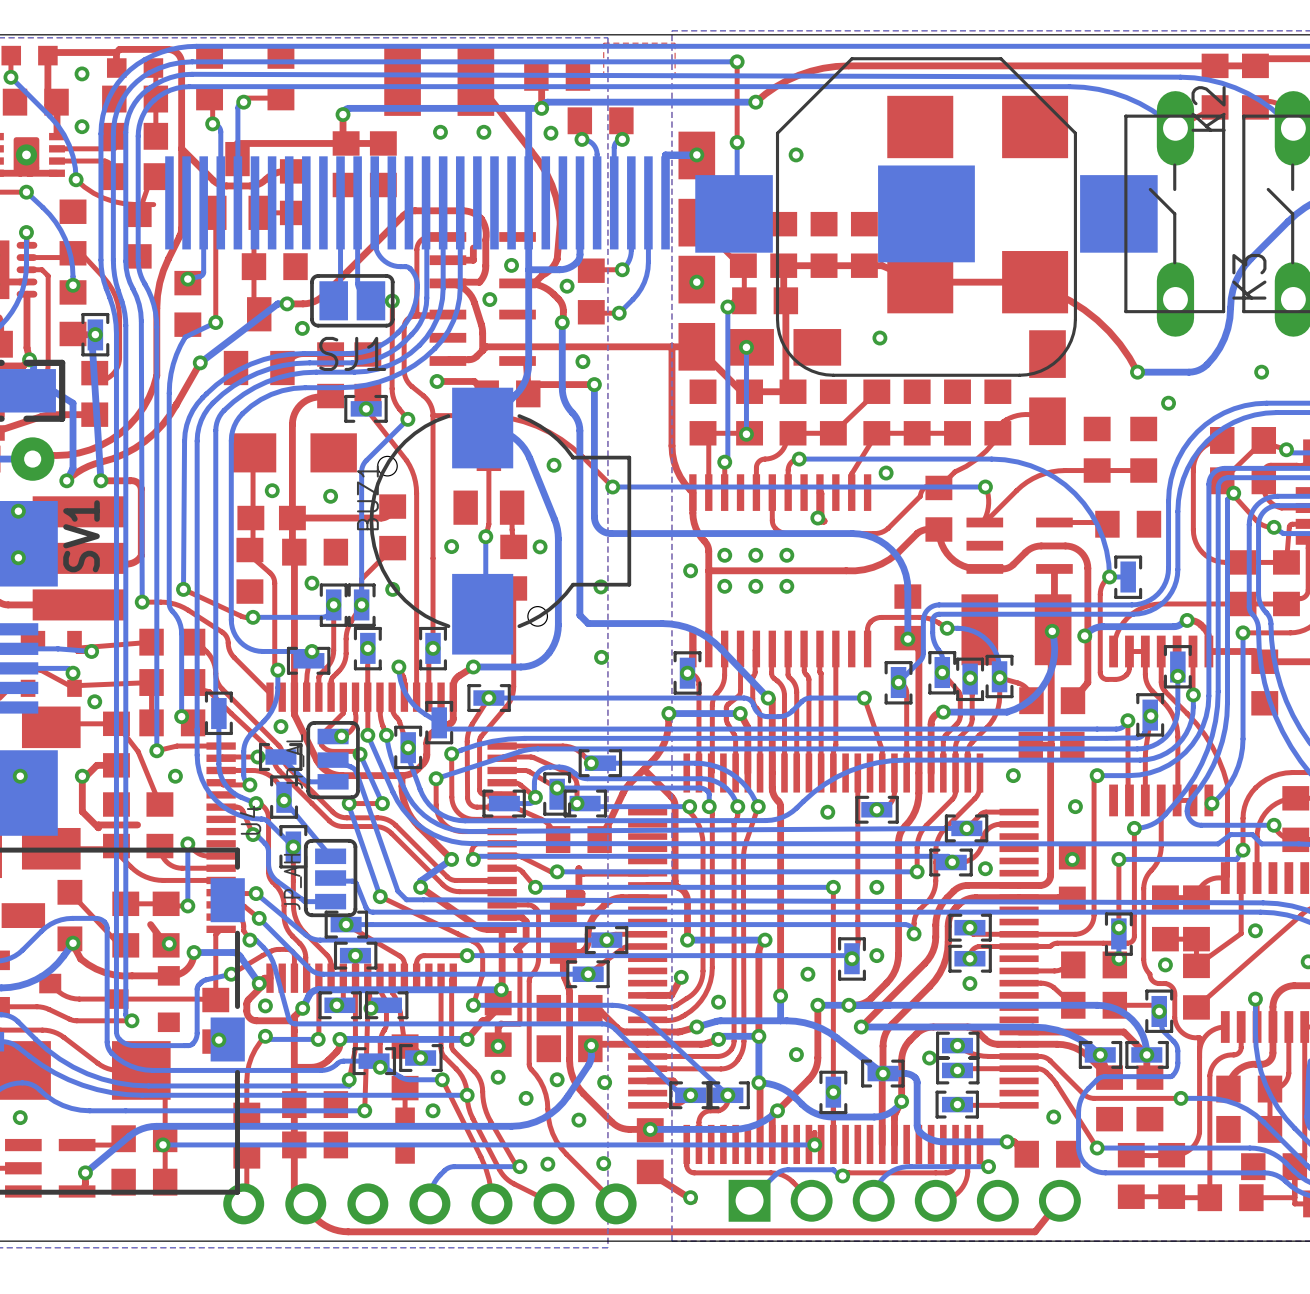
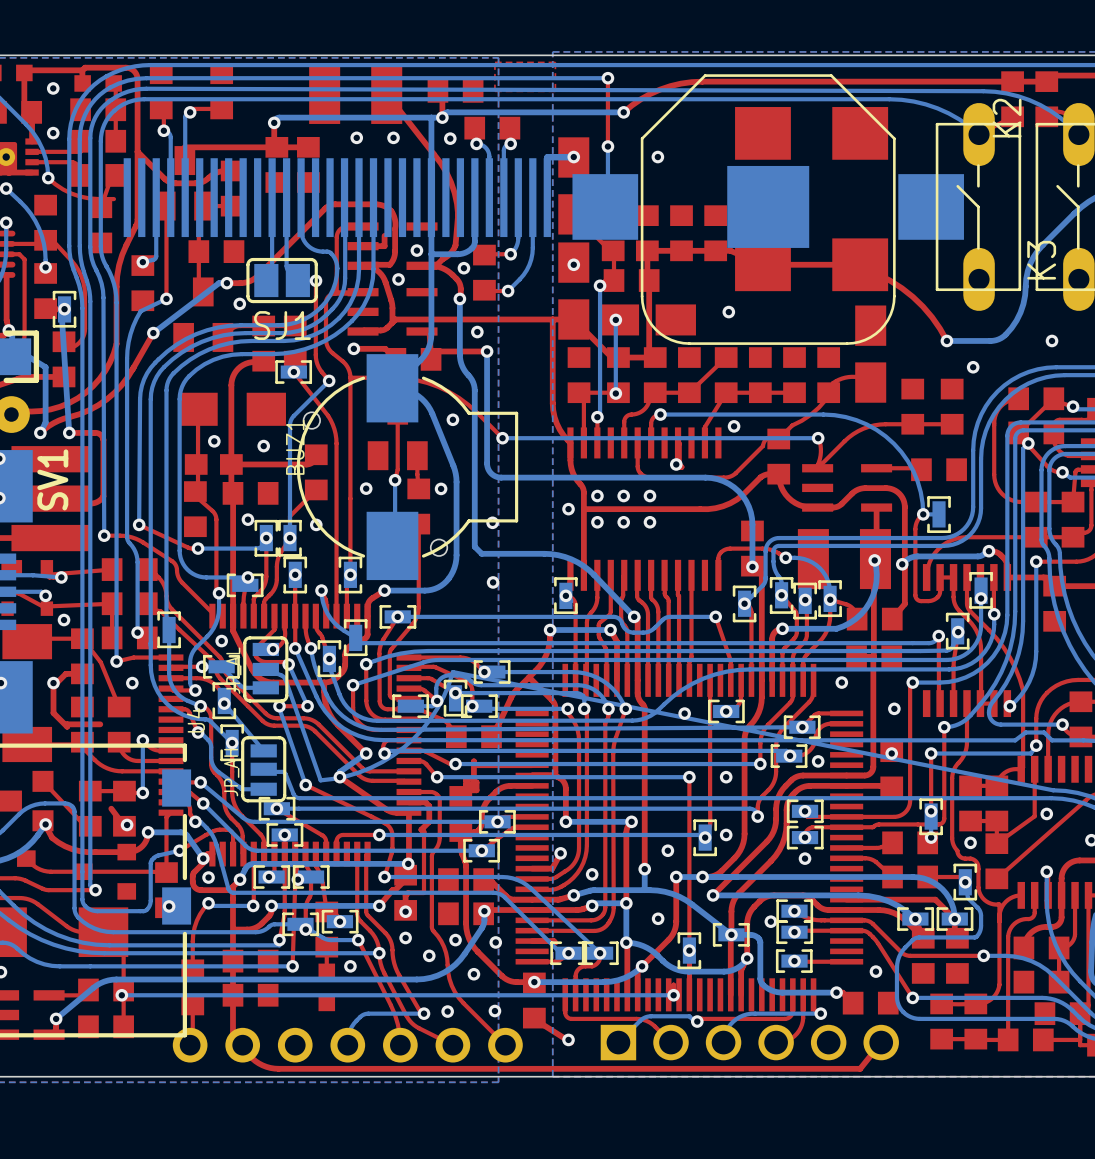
bottom track: (397, 891) (406, 899) (1263, 902) -> (320, 780) (346, 776) (370, 767) (404, 747) (430, 718) (443, 696) (452, 672) (1053, 790)

